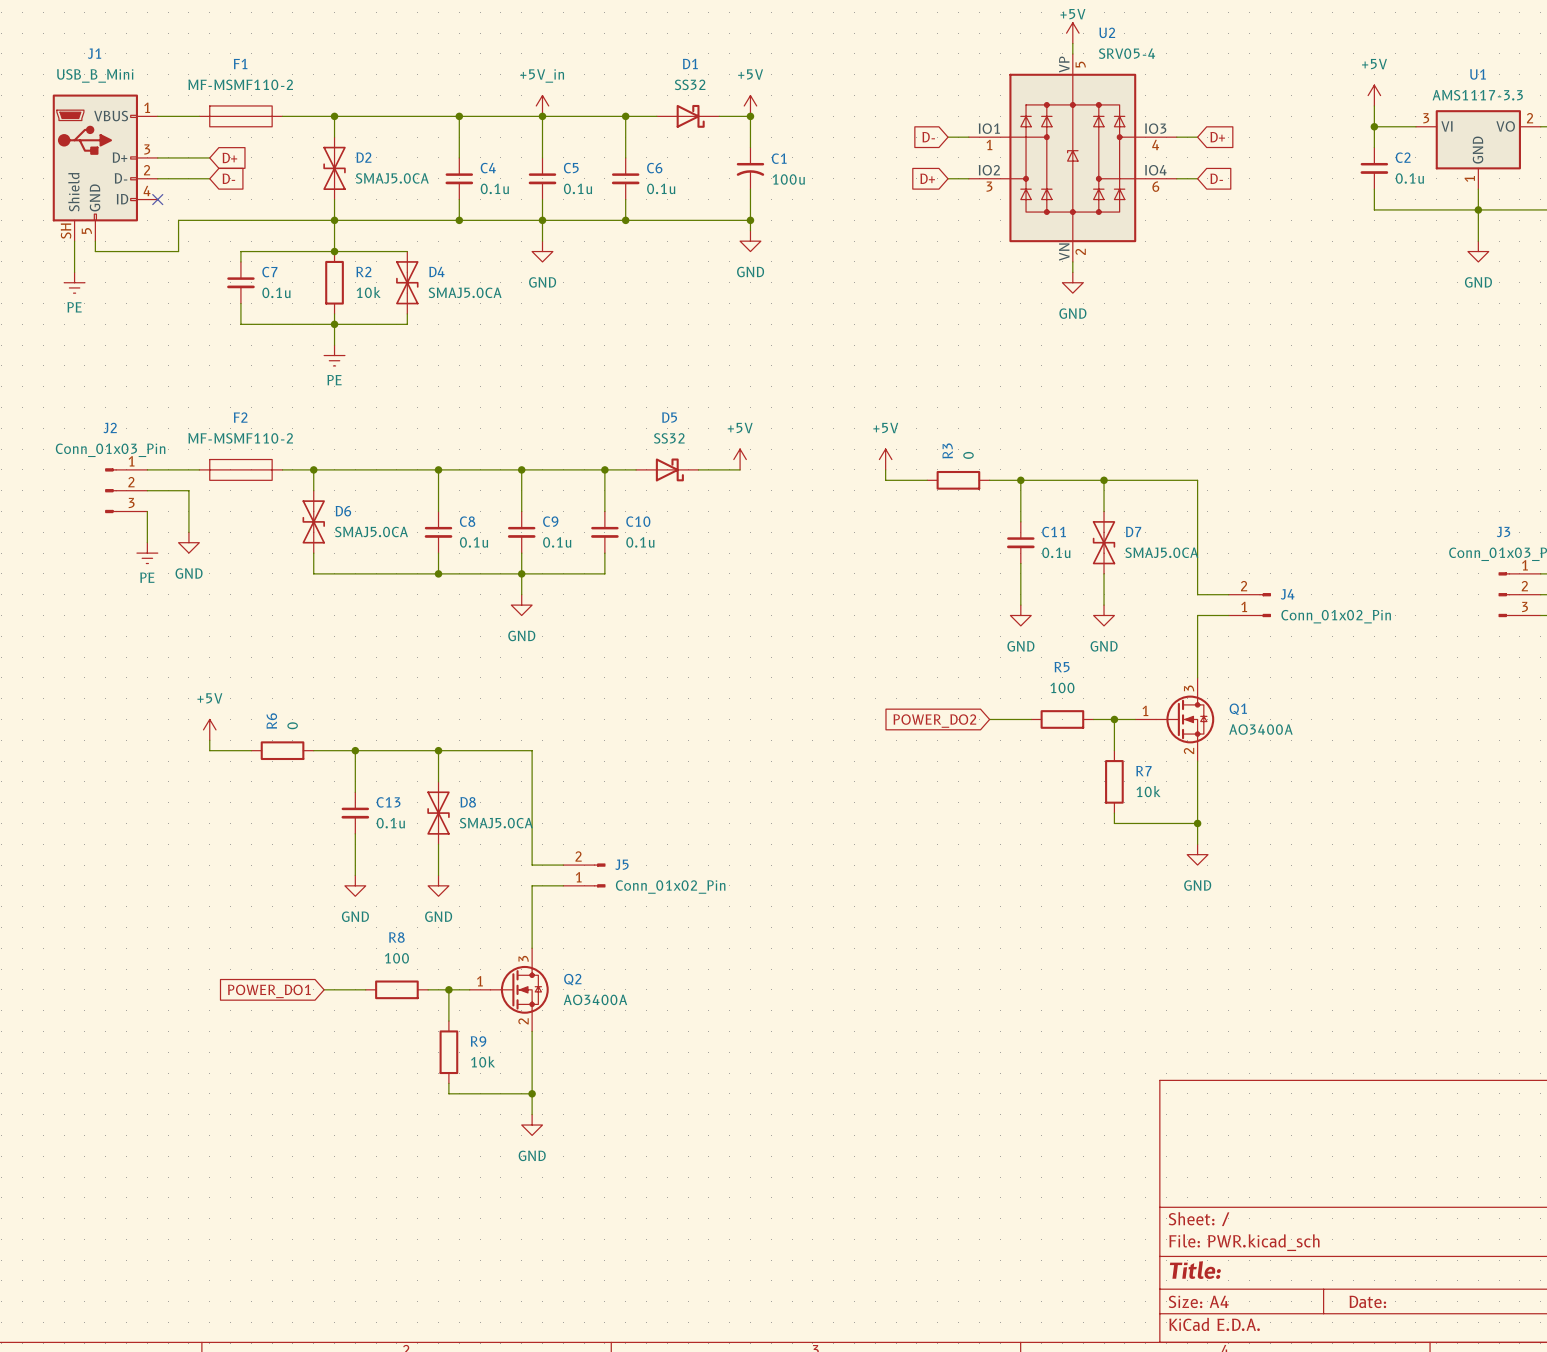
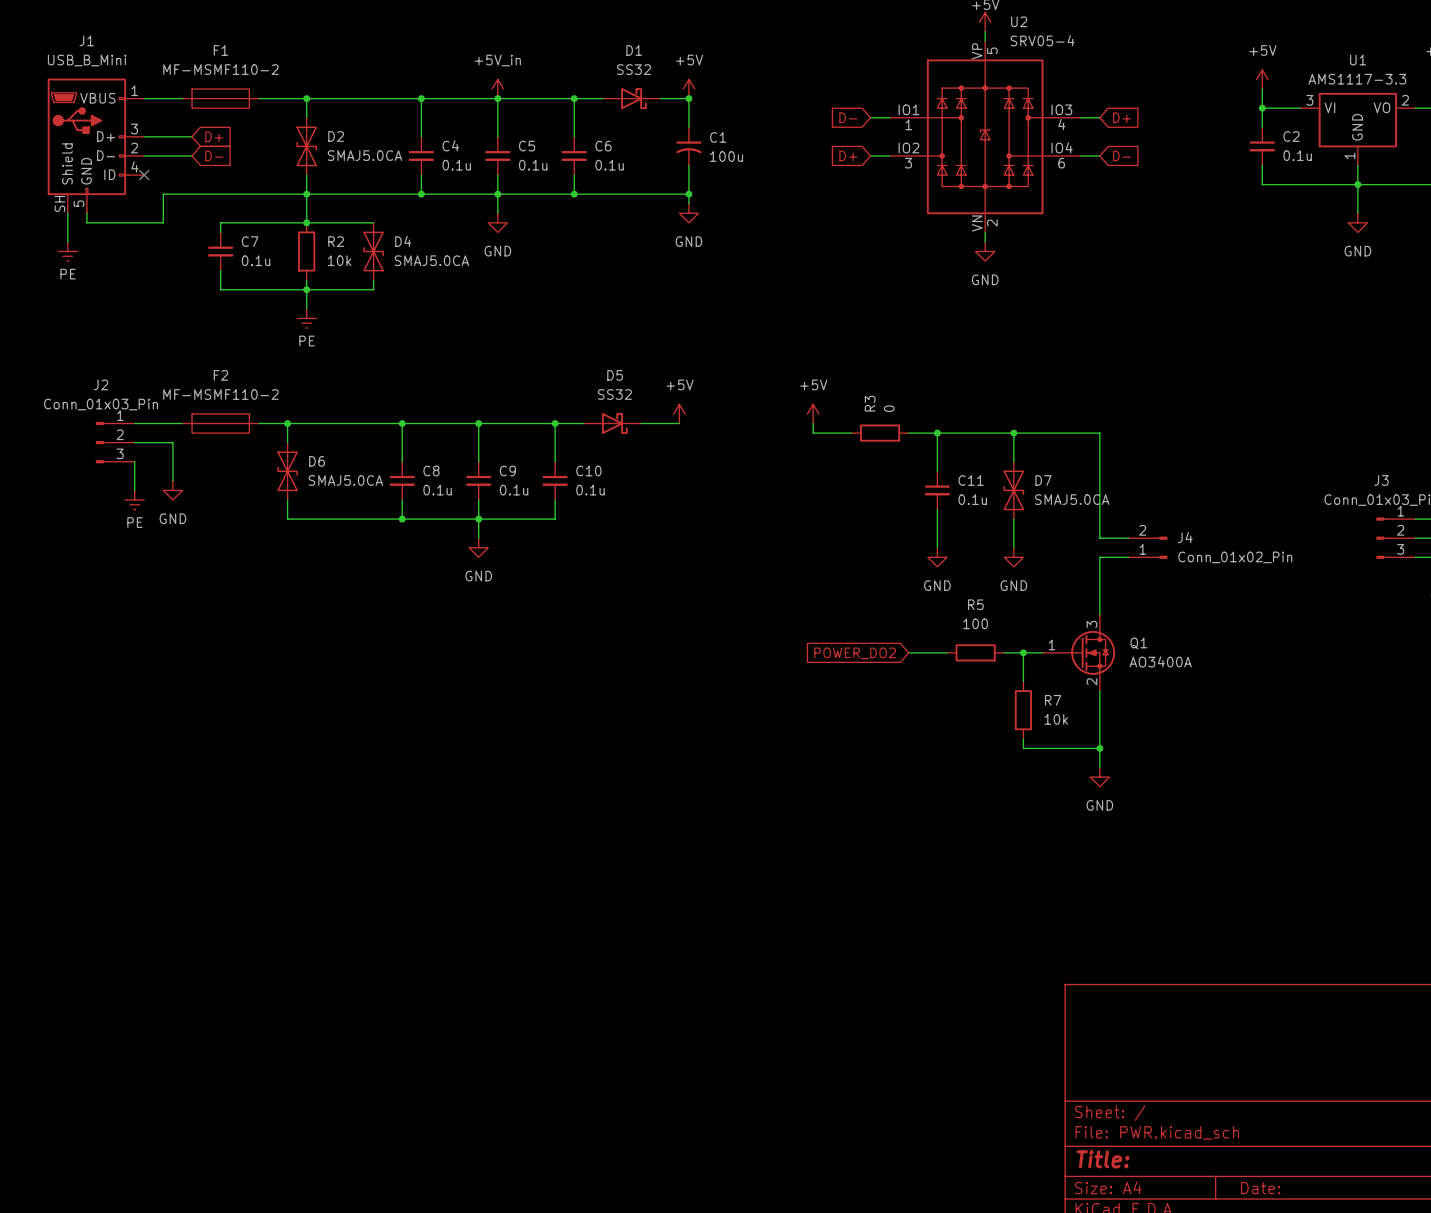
power symbol: +5V (209, 729) -> none
wire: (209, 740) (209, 750) (251, 750) -> none
R6: 0 (282, 750) -> none
wire: (313, 750) (532, 750) (532, 865) (563, 865) -> none
wire: (355, 750) (355, 792) -> none
junction: (355, 750) -> none
wire: (438, 750) (438, 781) -> none
junction: (438, 750) -> none
C13: 0.1u (355, 813) -> none
D8: SMAJ5.0CA (438, 813) -> none
wire: (355, 833) (355, 875) -> none
wire: (438, 844) (438, 875) -> none
J5: Conn_01x02_Pin (584, 875) -> none
power symbol: GND (355, 885) -> none
power symbol: GND (438, 885) -> none
wire: (563, 885) (532, 885) (532, 948) -> none
wire: (324, 989) (365, 989) -> none
R8: 100 (396, 989) -> none
wire: (428, 989) (469, 989) -> none
wire: (448, 989) (448, 1021) -> none
junction: (448, 989) -> none
Q2: AO3400A (509, 989) -> none
global label: POWER_DO1 (269, 991) -> none
wire: (532, 1031) (532, 1114) -> none
R9: 10k (448, 1052) -> none
wire: (448, 1083) (448, 1093) (532, 1093) -> none
junction: (532, 1093) -> none
power symbol: GND (532, 1125) -> none

